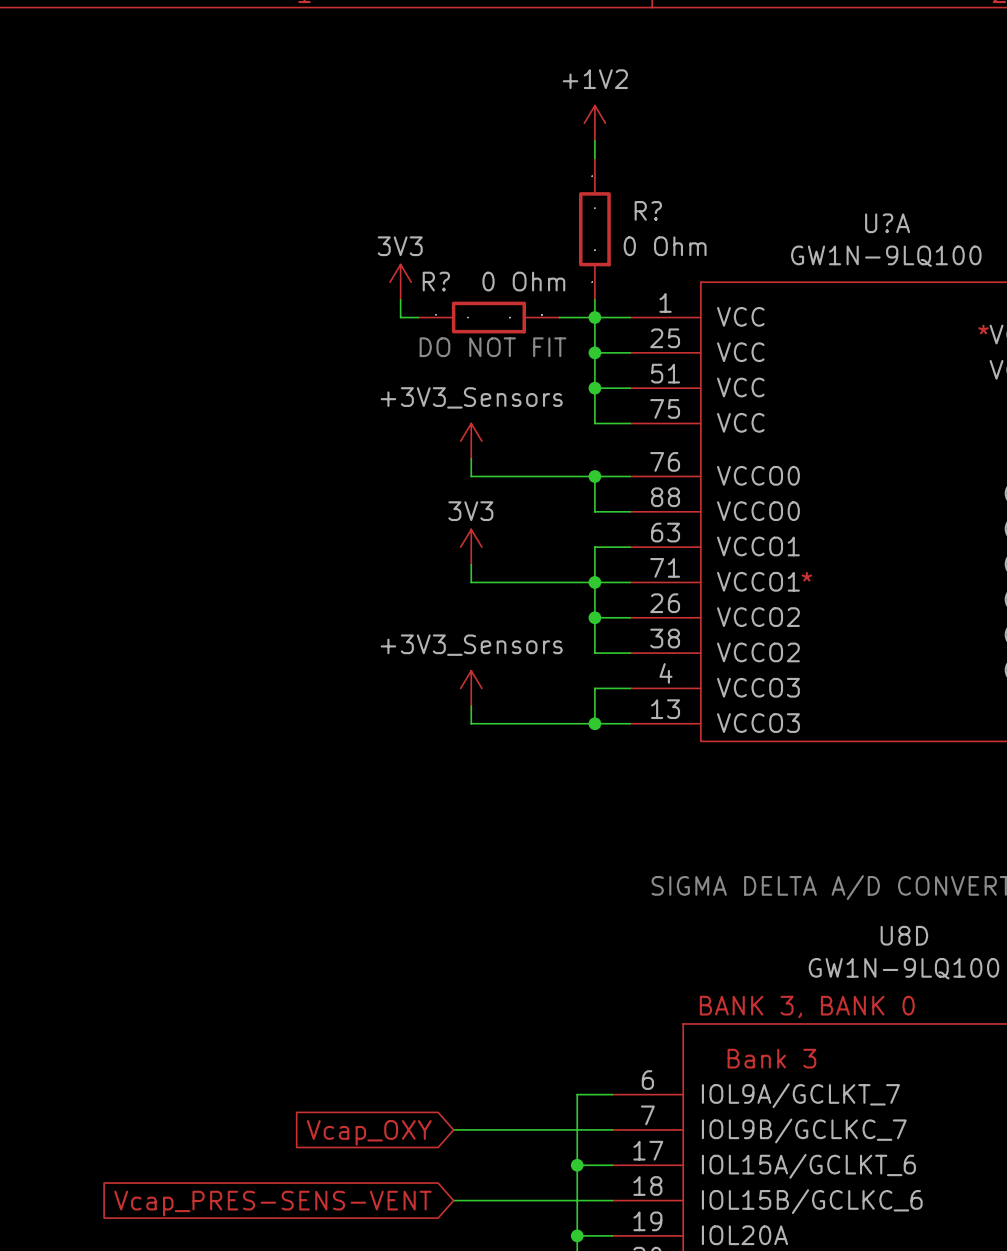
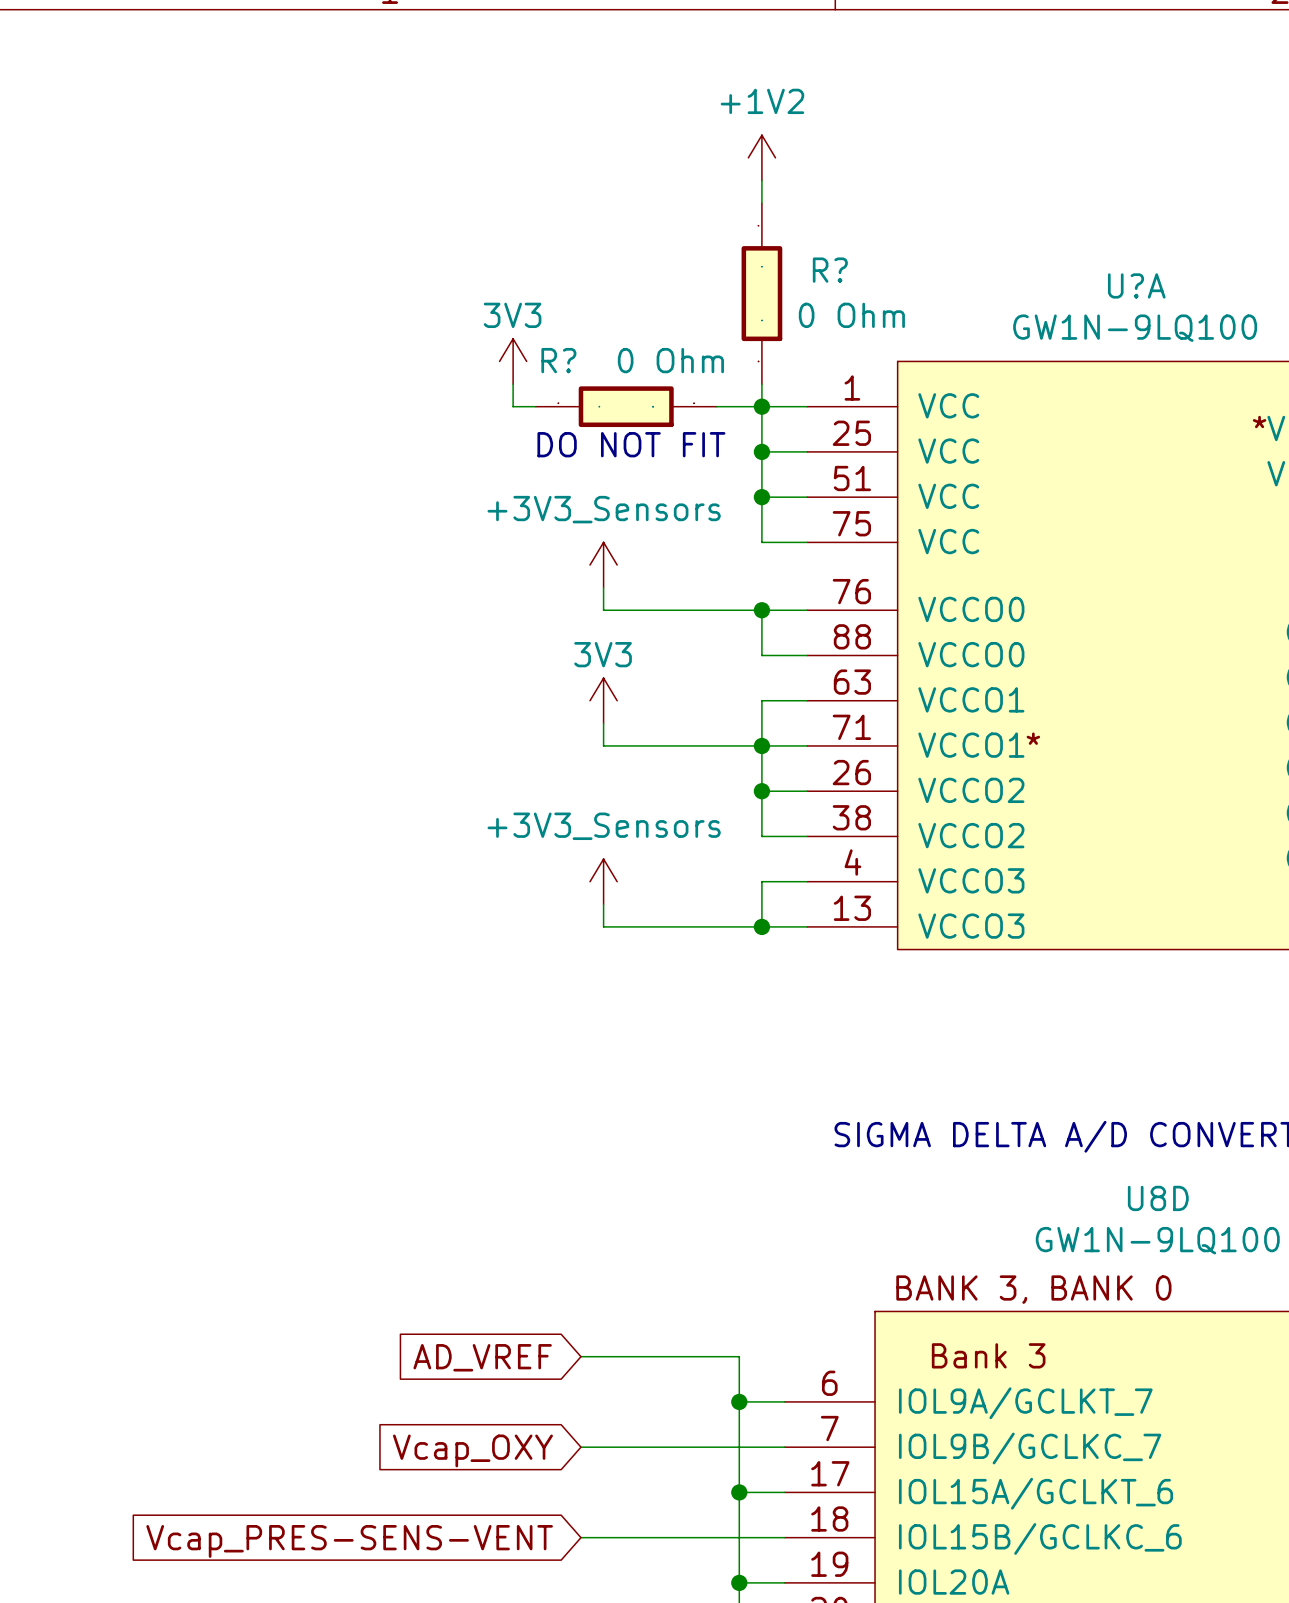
wire: none -> (580, 1356) (739, 1356) (739, 1401)
global label: none -> AD_VREF (482, 1357)
junction: none -> (739, 1401)

